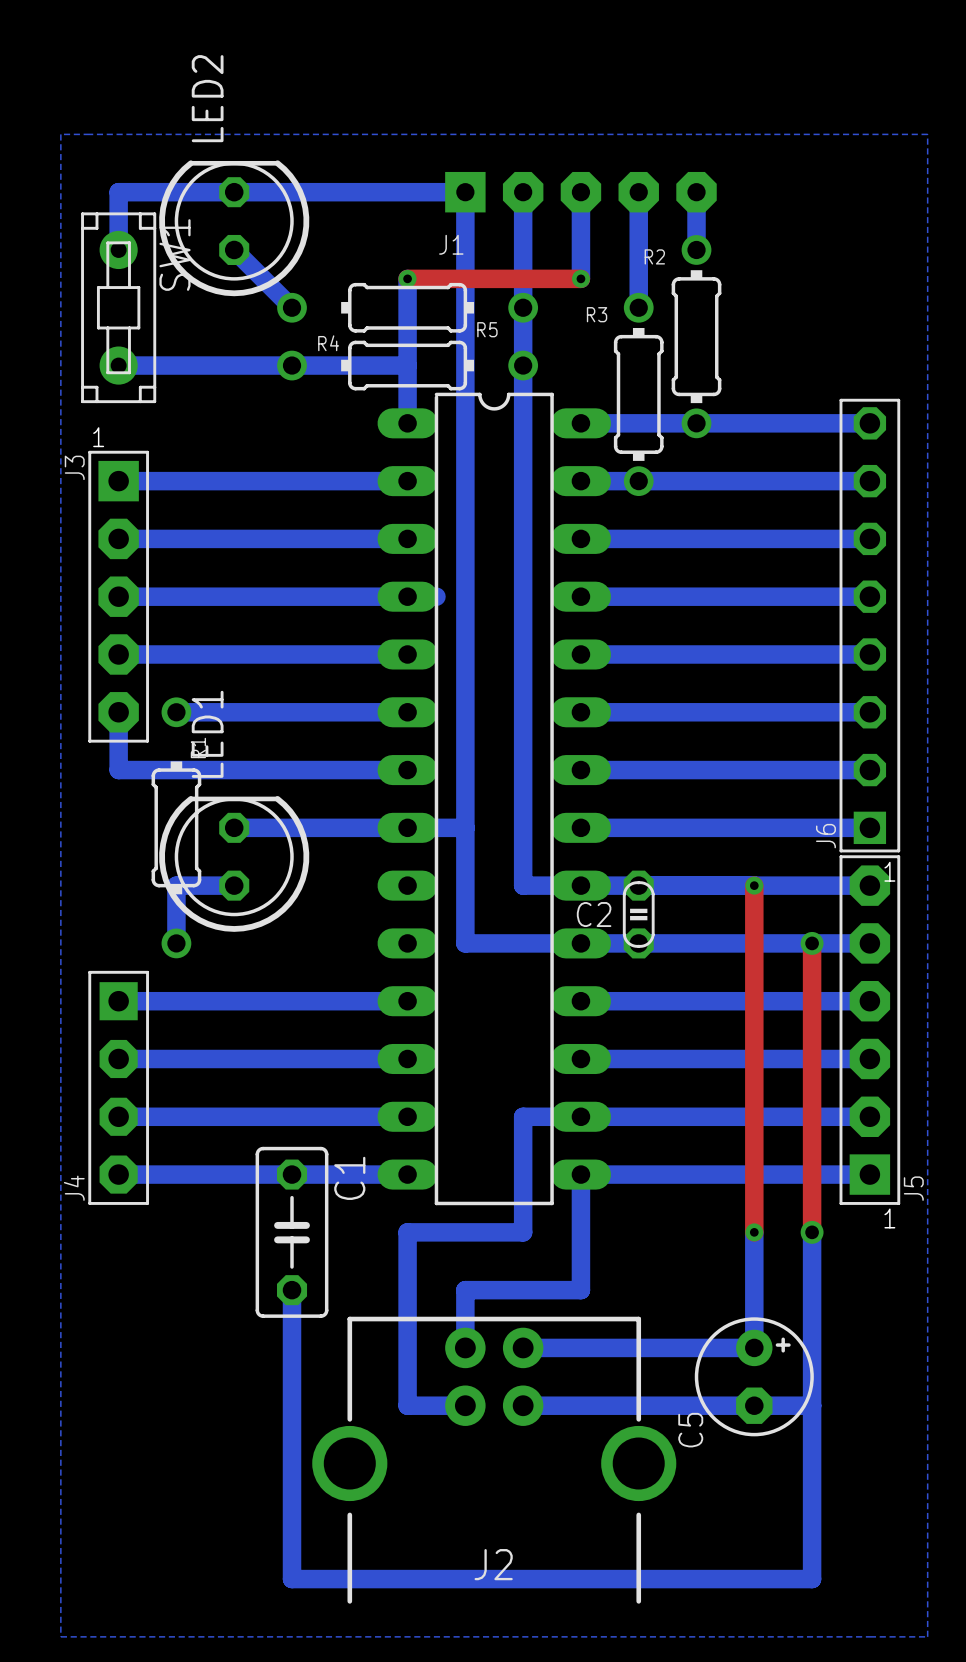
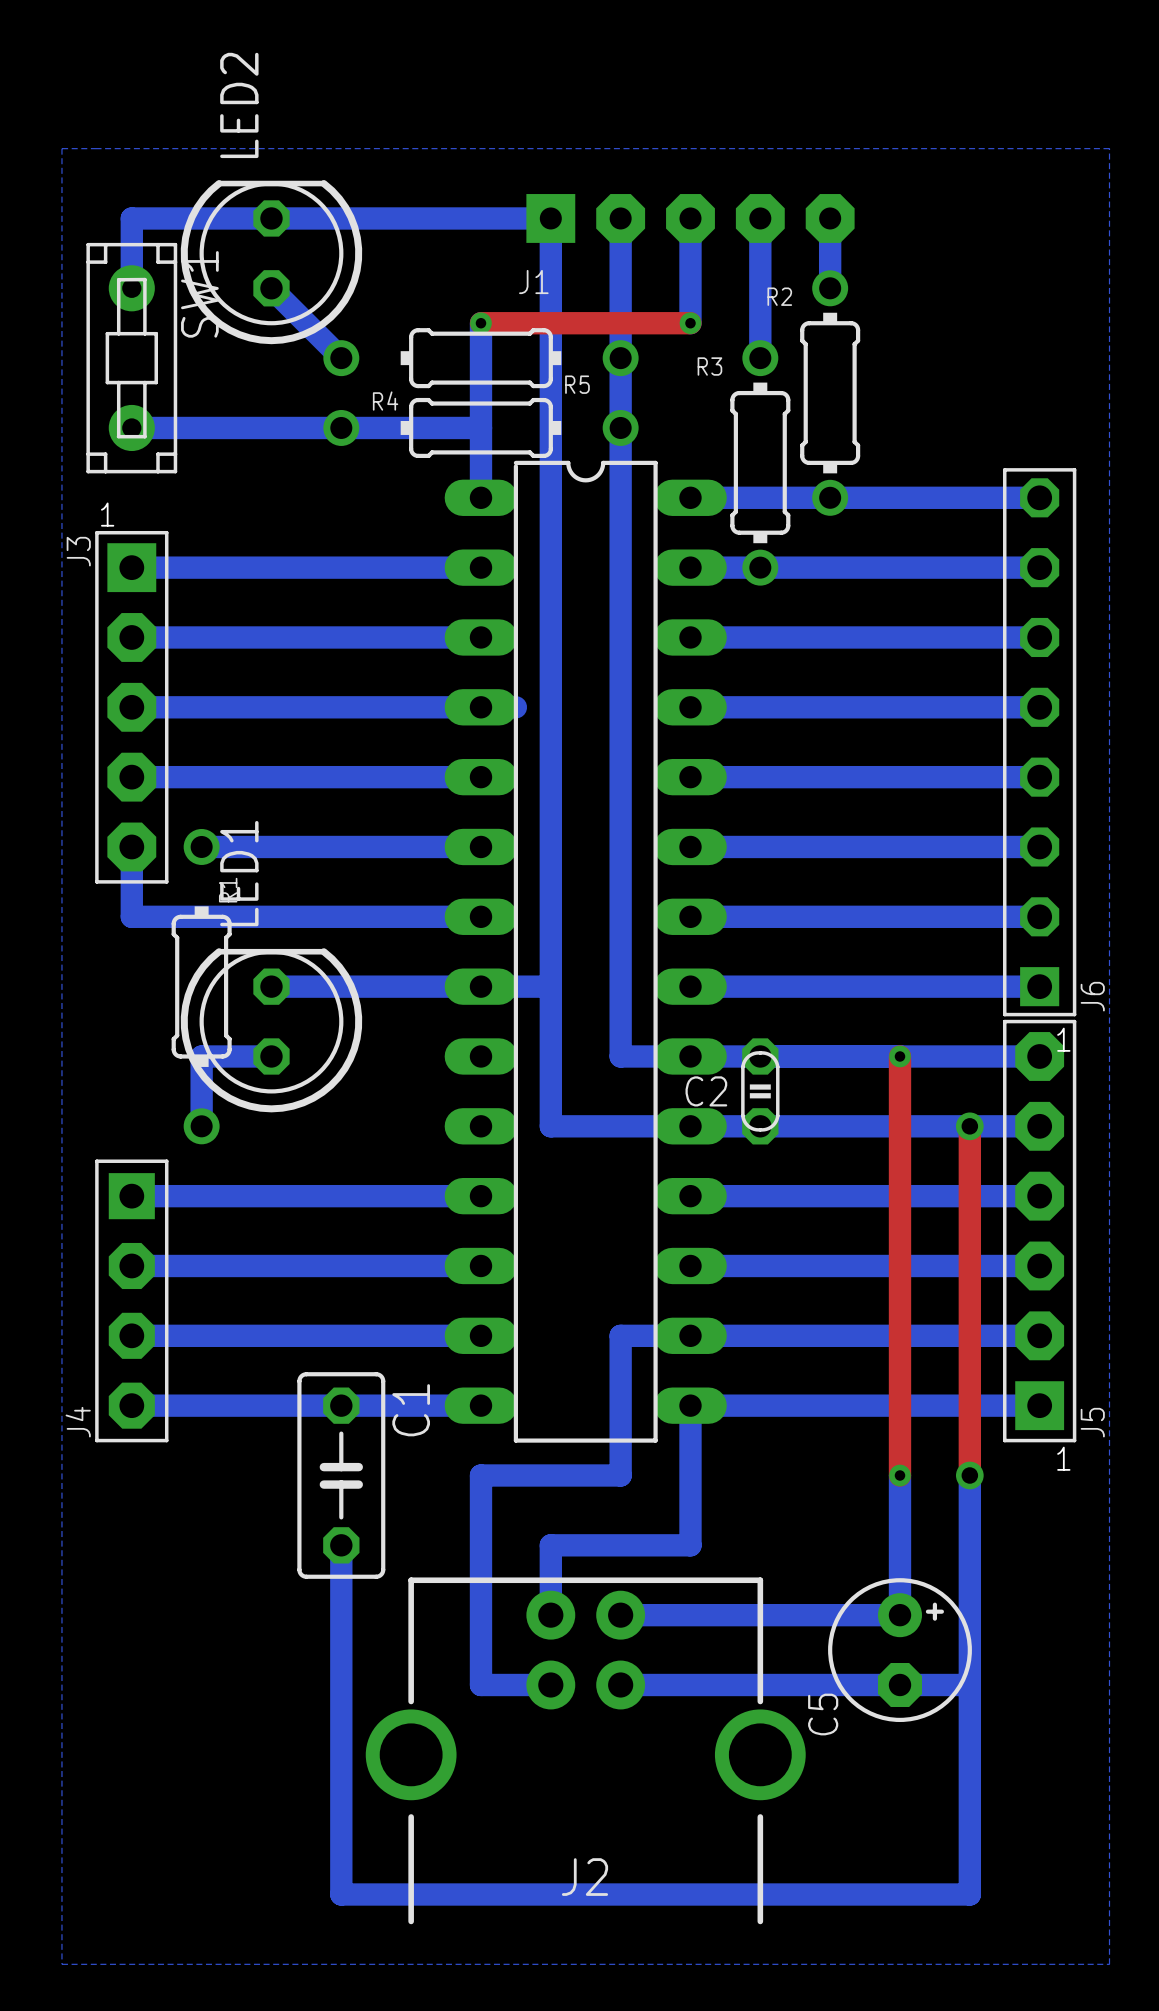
J6 name position: J6 (825, 836) -> J6 (1092, 996)

